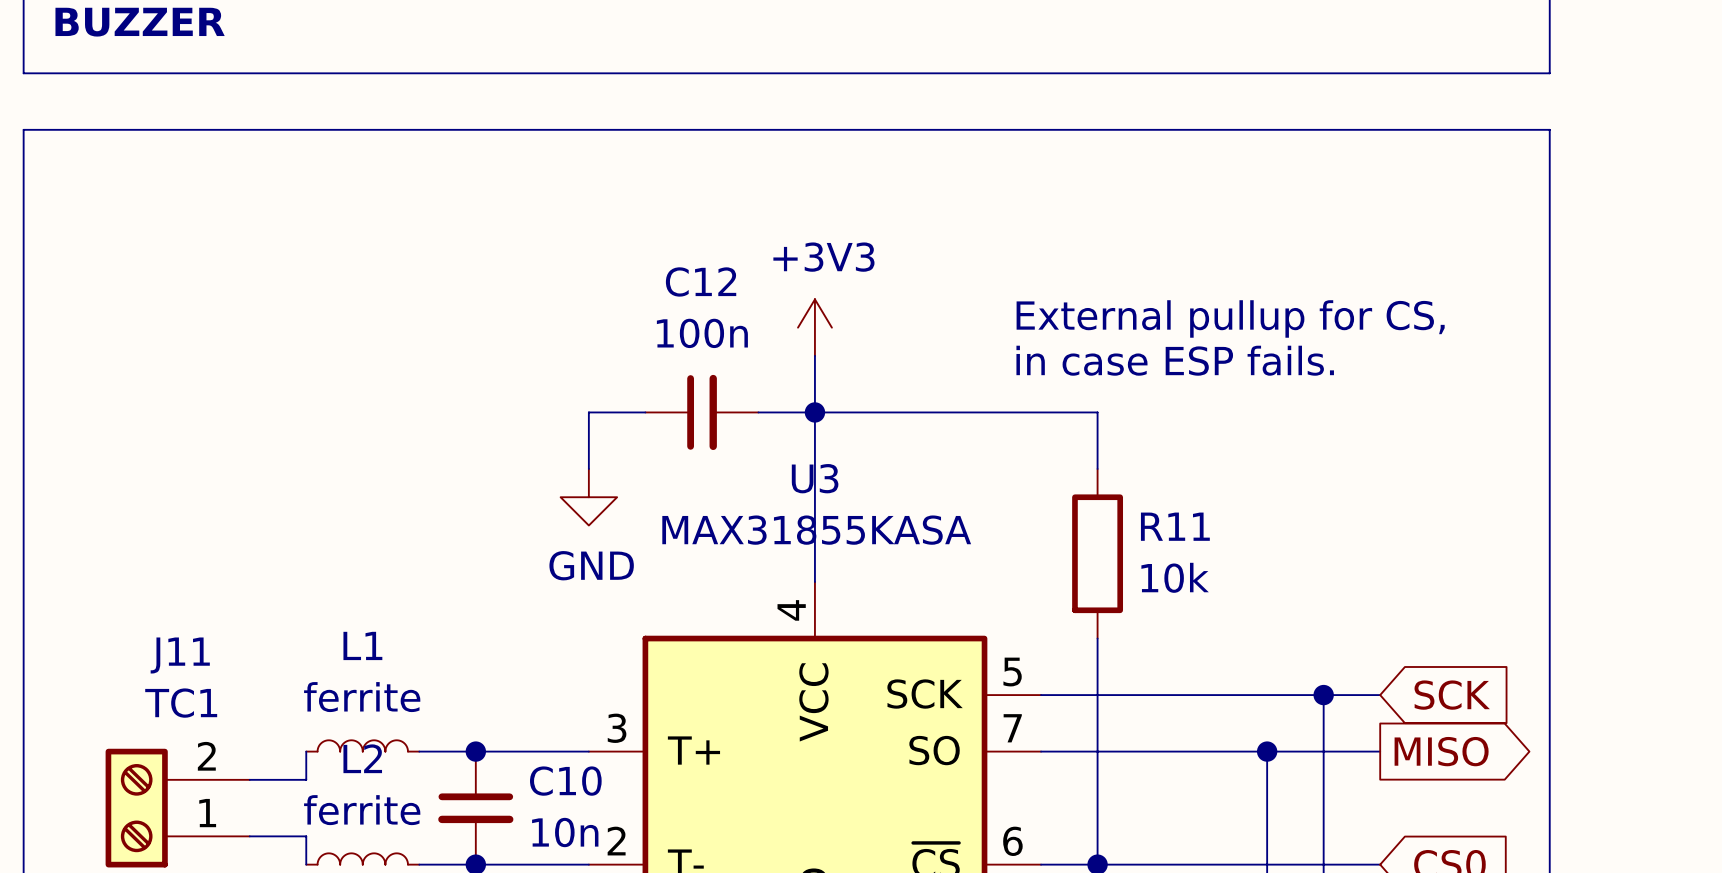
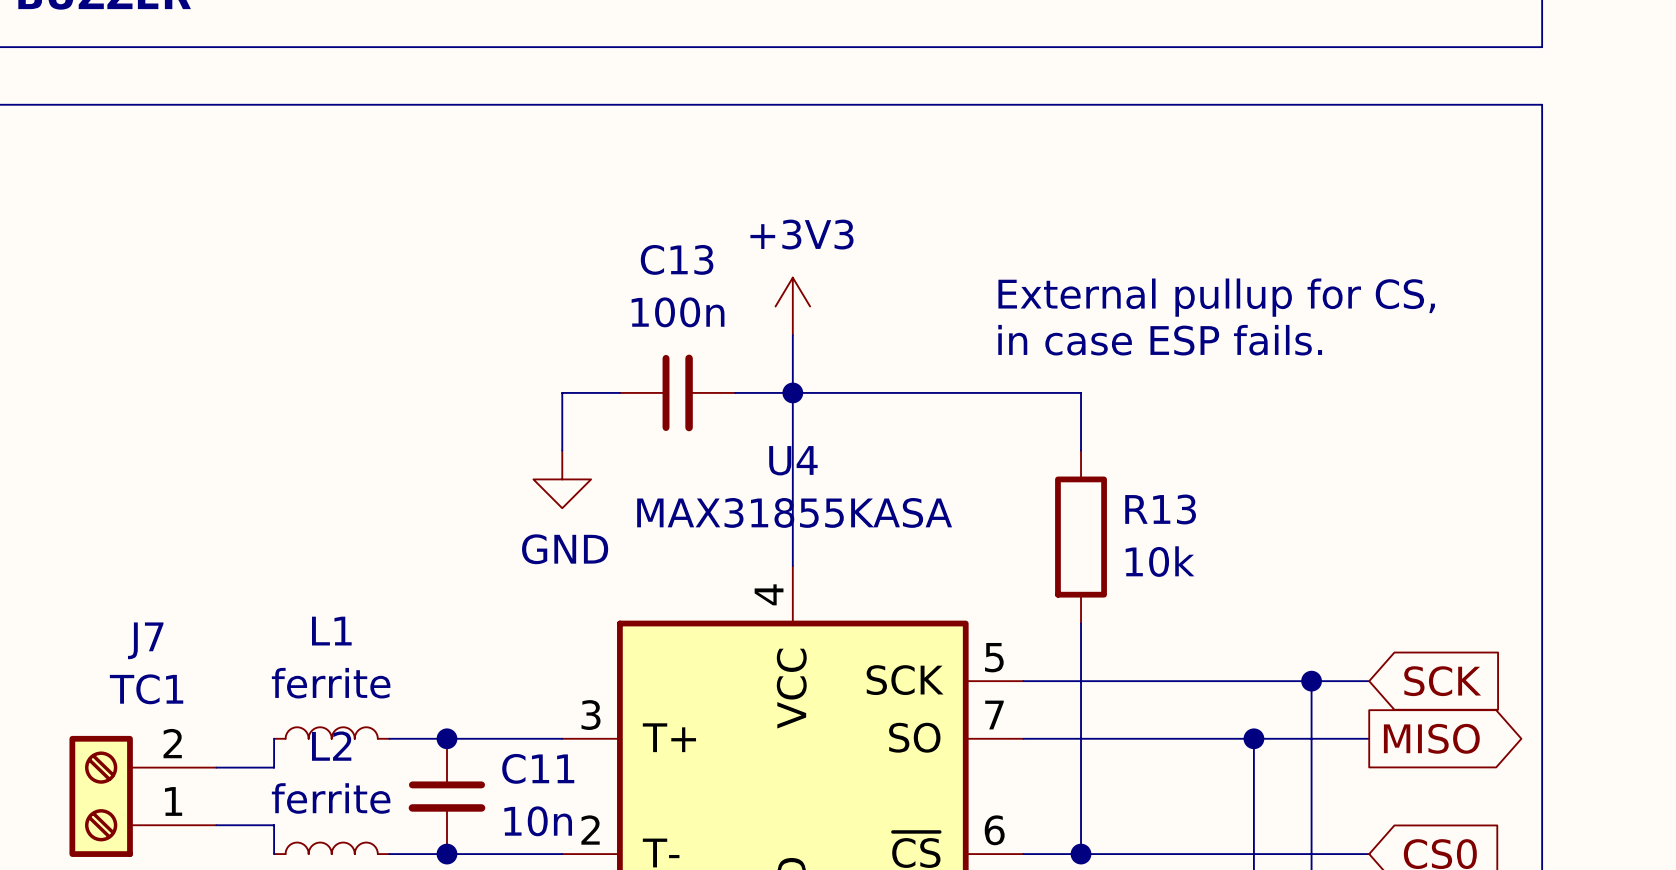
C12 name: C12 (701, 281) -> C13 (677, 259)
U3 name: U3 (815, 478) -> U4 (793, 460)
R11 name: R11 (1175, 526) -> R13 (1160, 509)
J11 name: J11 (180, 655) -> J7 (145, 640)
C10 name: C10 (565, 781) -> C11 (538, 768)

